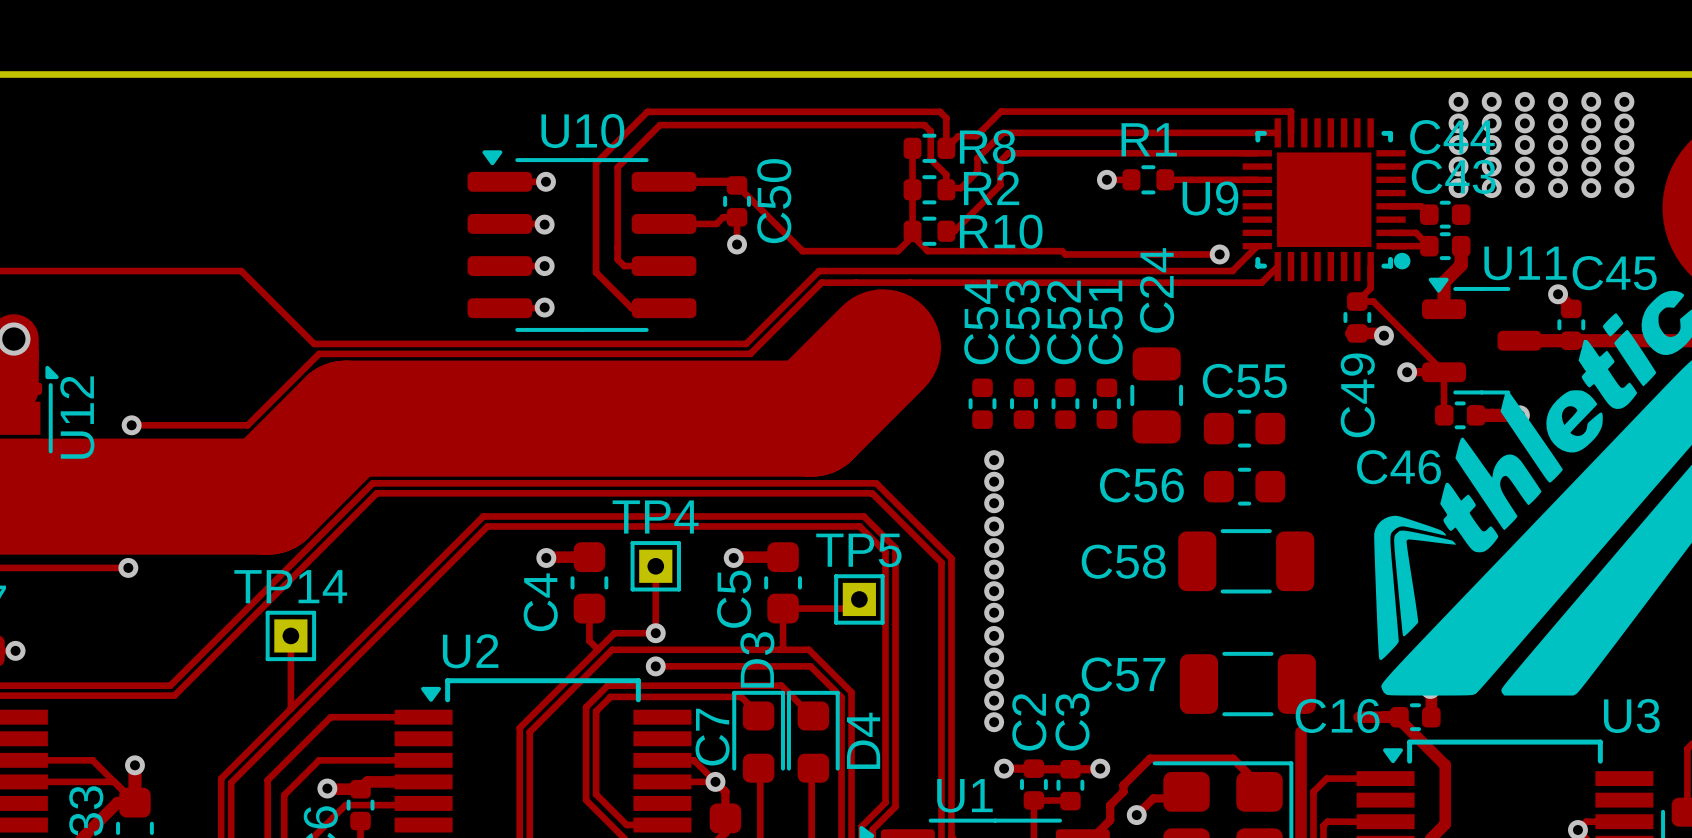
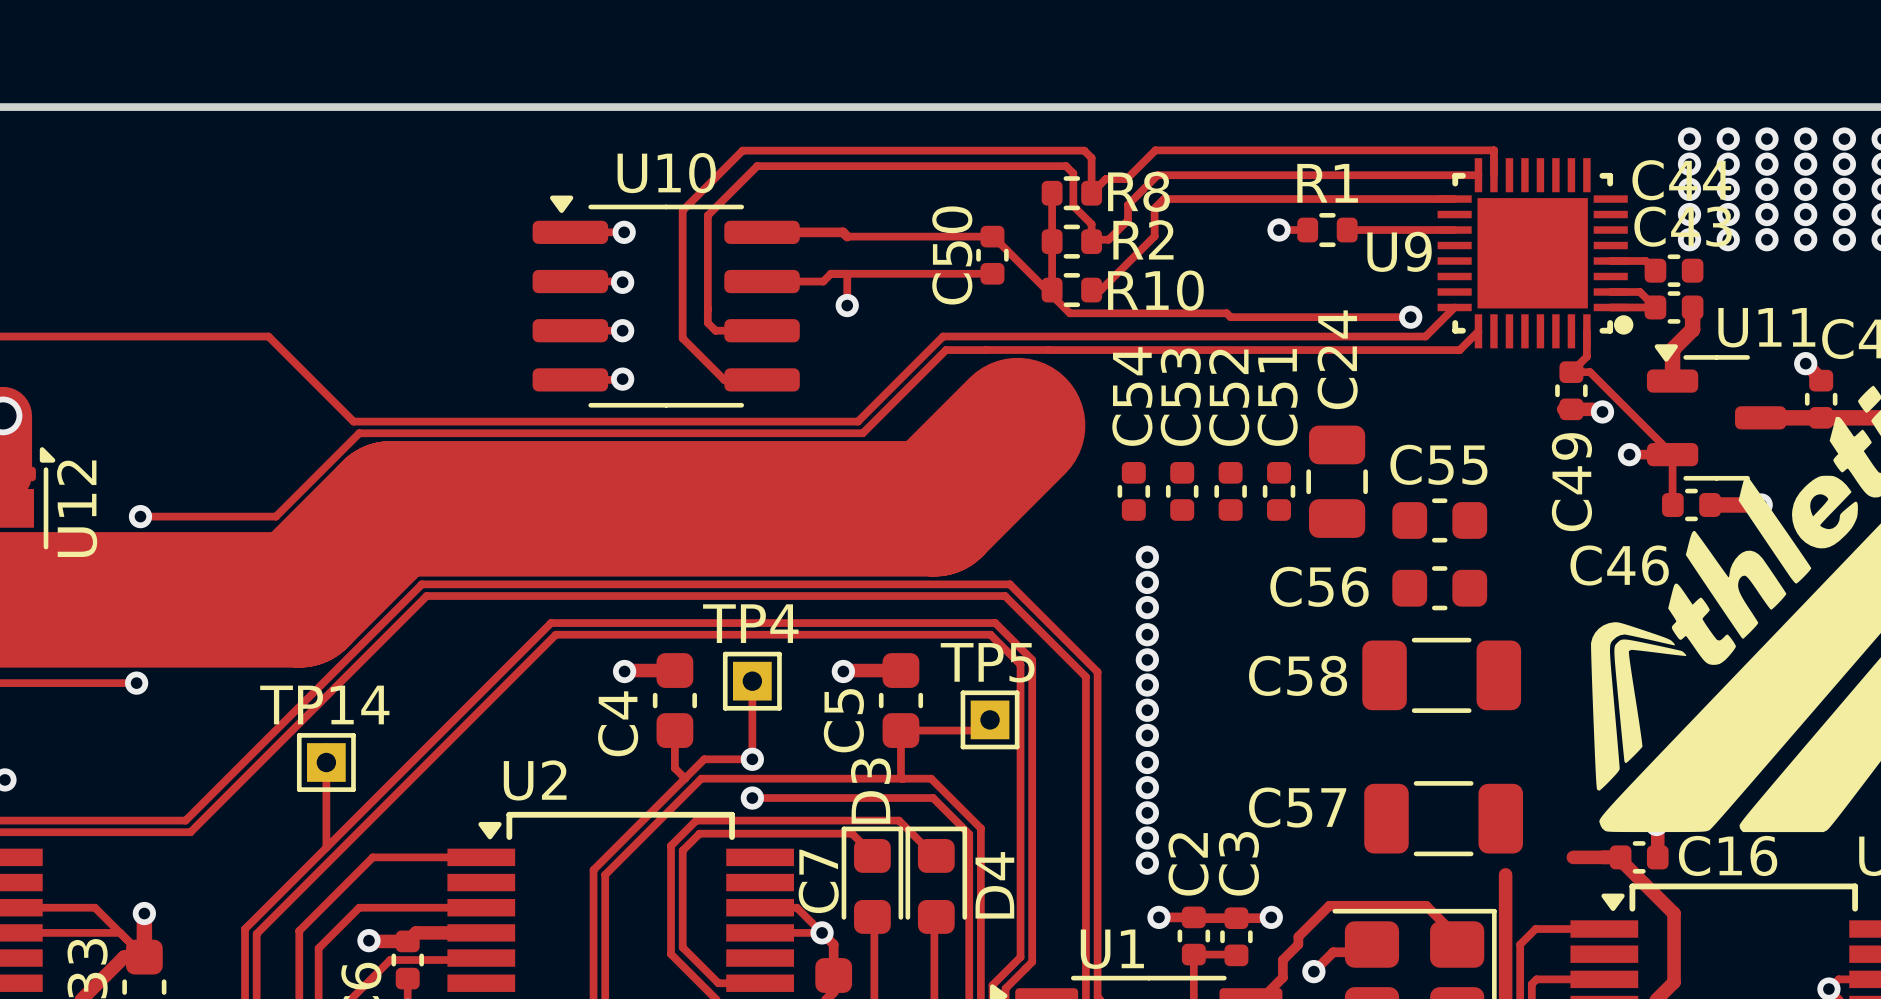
track: (737, 185) (802, 251) (897, 251) (912, 236) -> (847, 236) (993, 236) (1052, 295)
C50 position: (737, 201) -> (992, 255)
C50 name position: C50 (774, 201) -> C50 (952, 255)
track: none -> (847, 273) (992, 273)
C16 name position: C16 (1337, 715) -> C16 (1728, 855)

